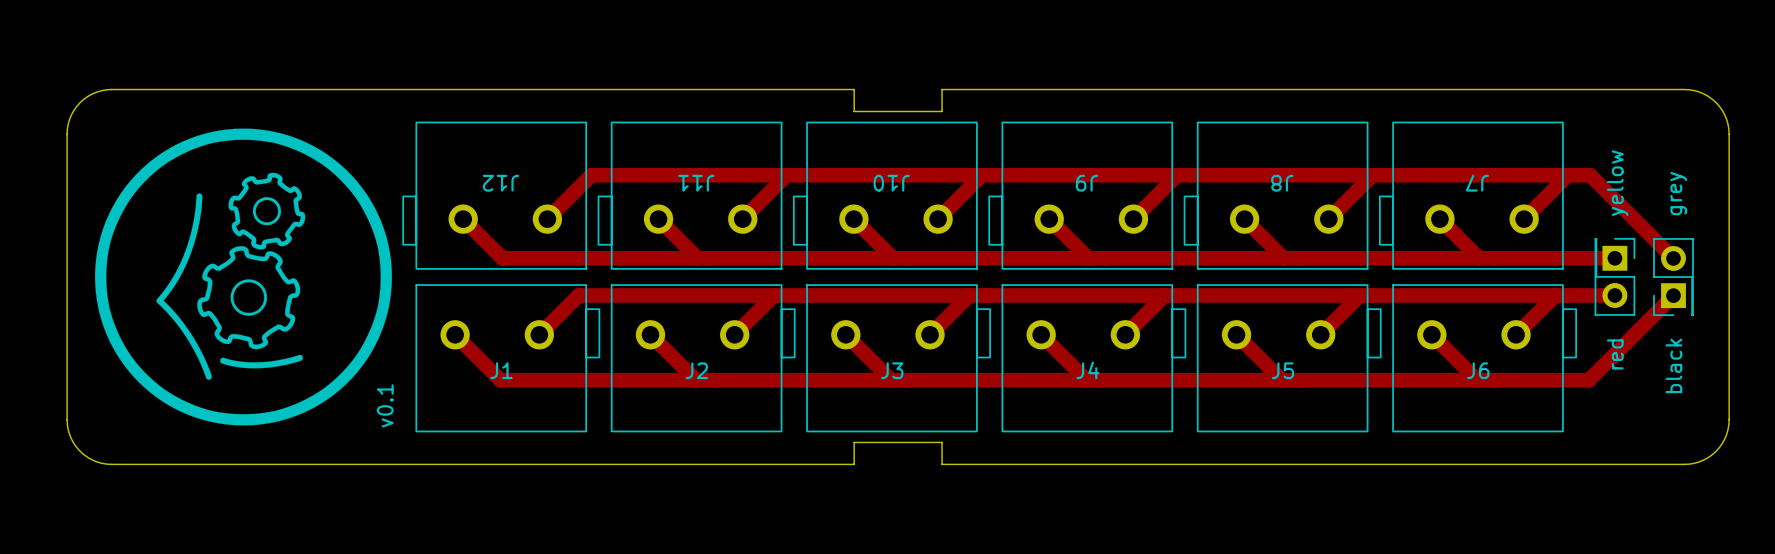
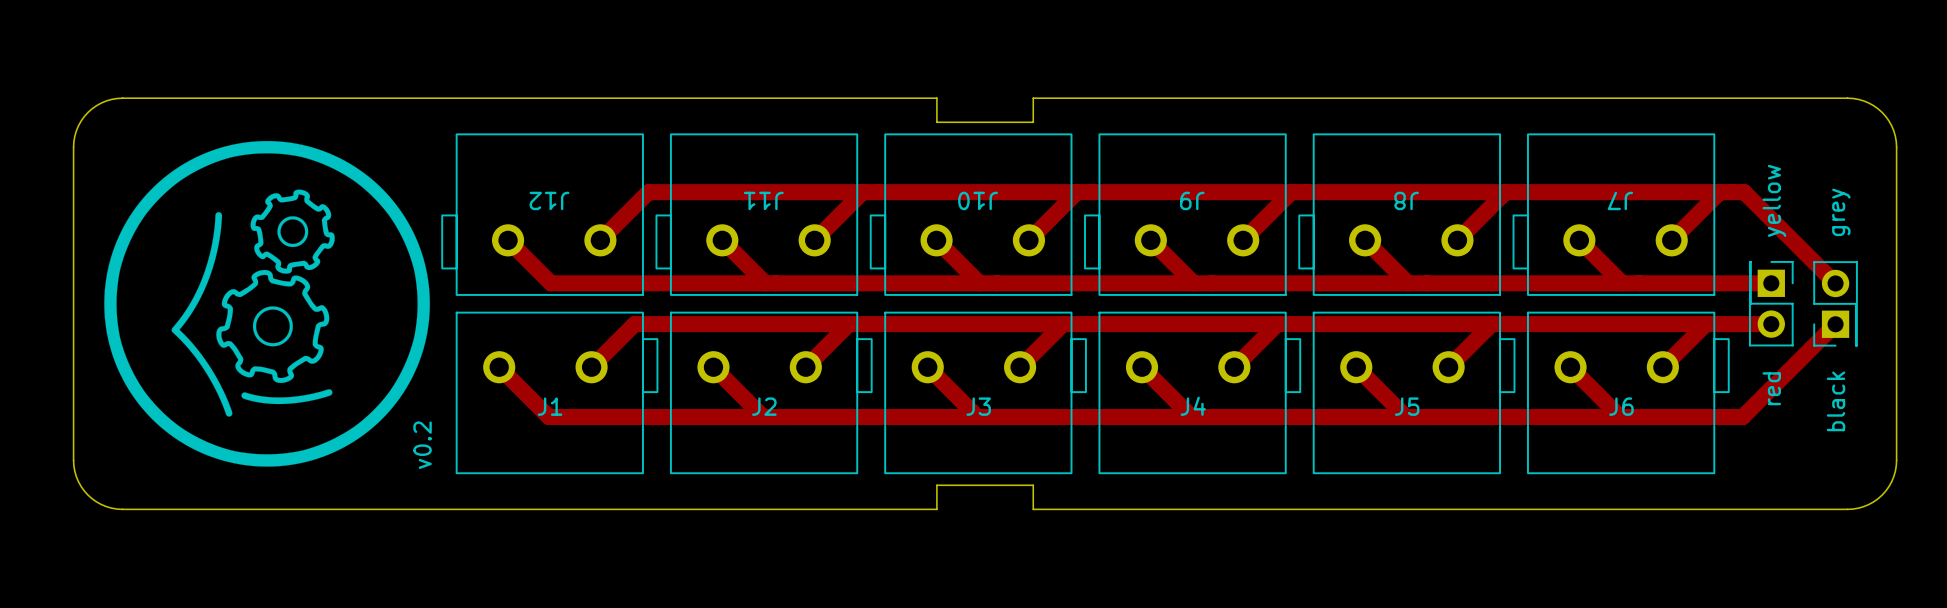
text: v0.1 (385, 405) -> v0.2 (422, 445)

